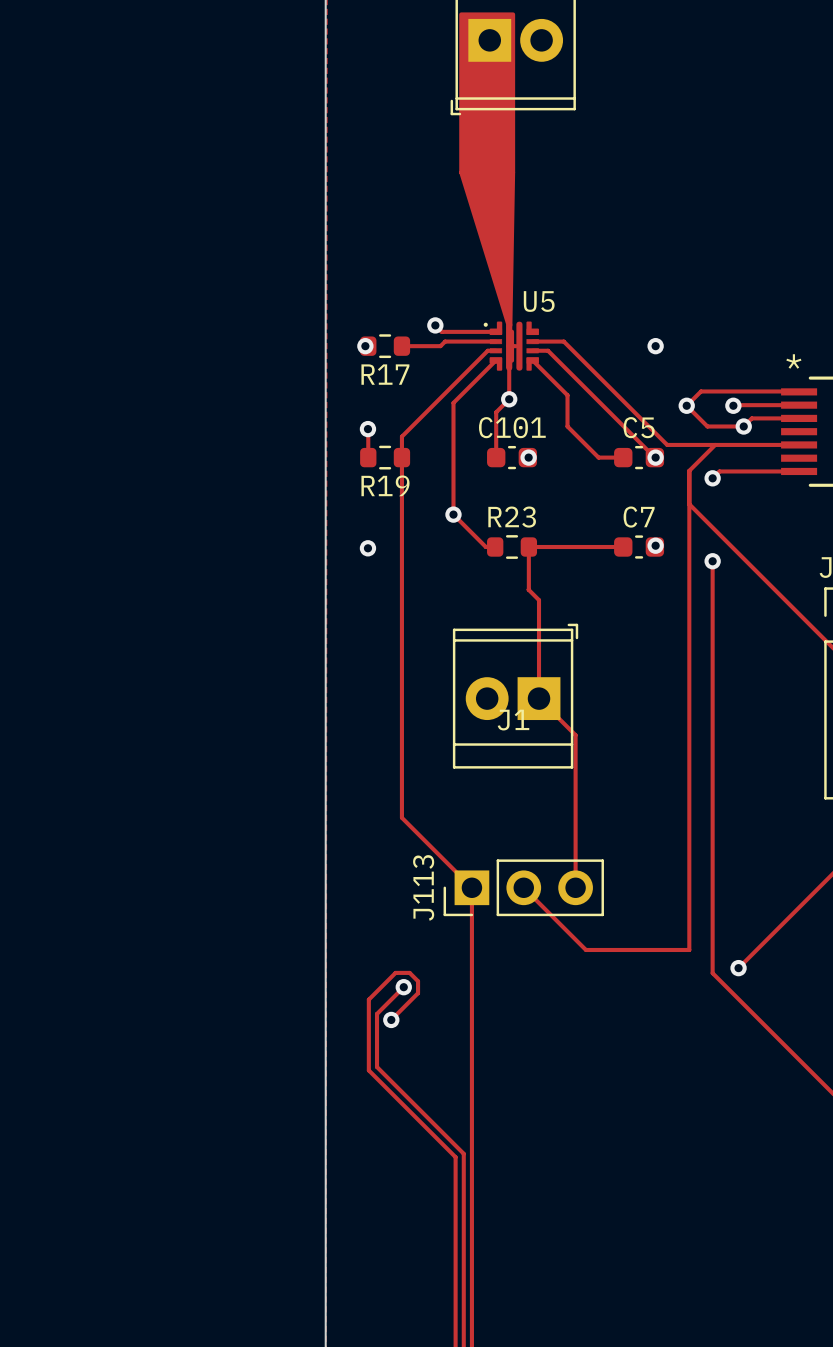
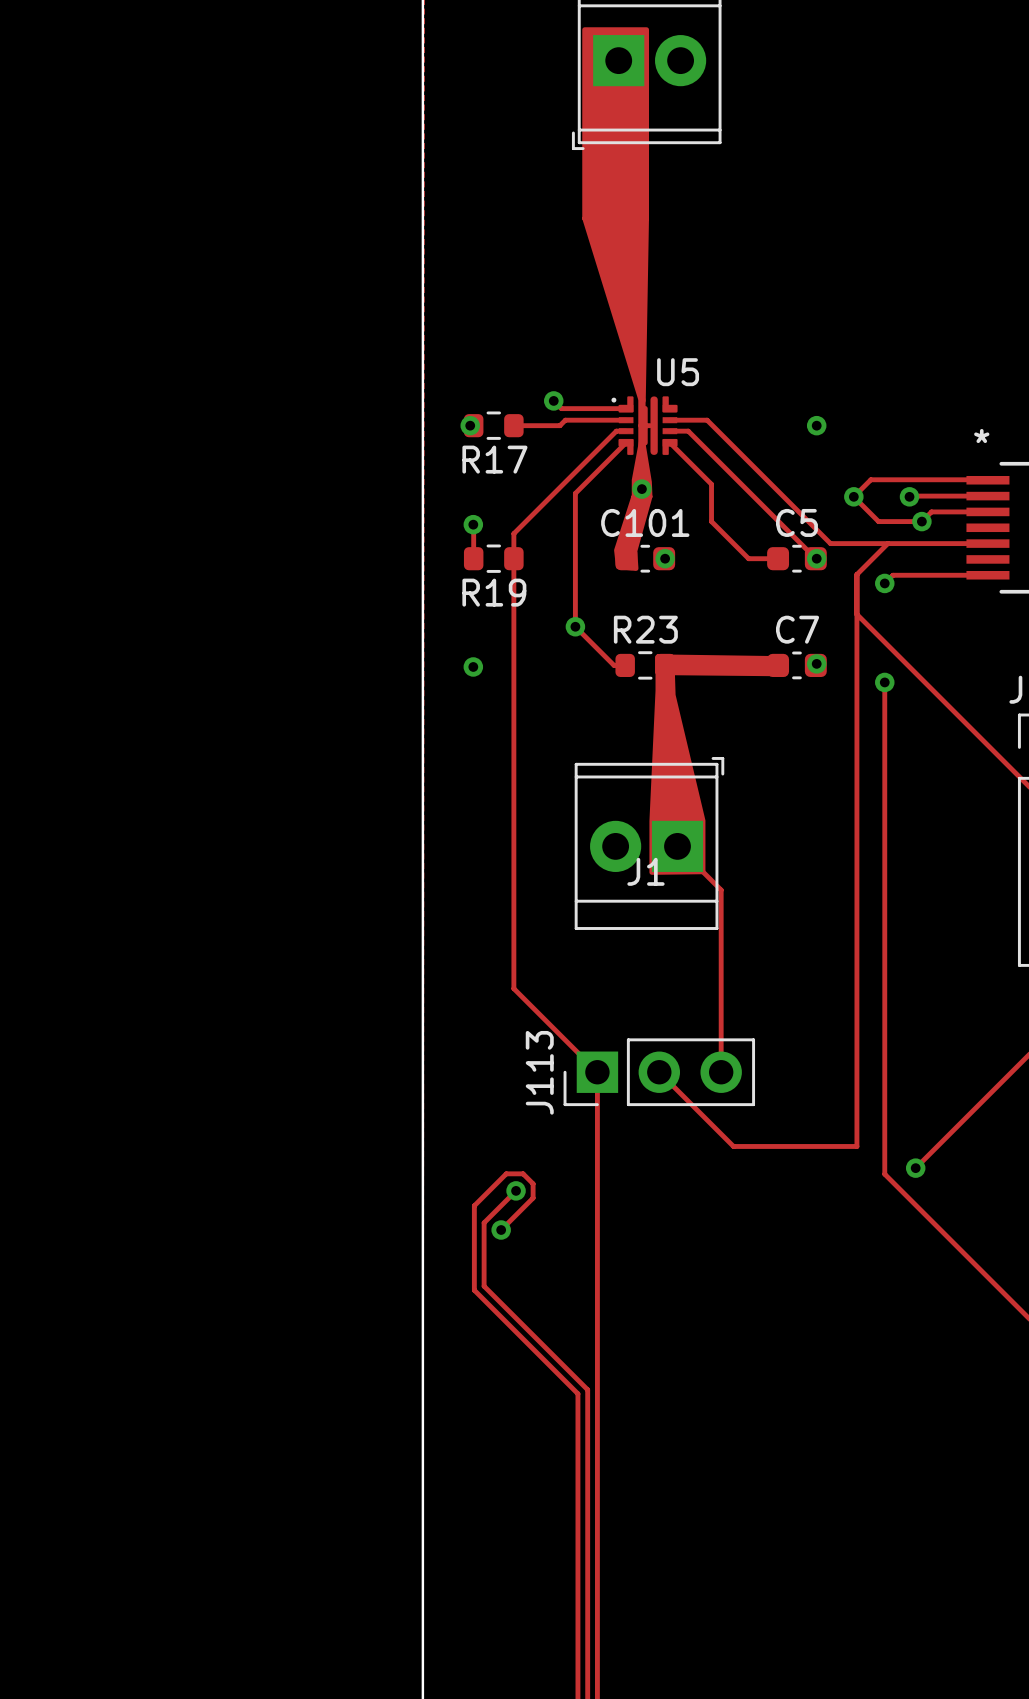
drawing: none -> [614, 435, 653, 571]
track: (509, 368) (509, 399) (496, 412) (496, 457) -> none
drawing: none -> [649, 654, 788, 875]
track: (623, 547) (528, 547) (528, 589) -> none
track: (528, 589) (539, 600) (539, 698) -> none

